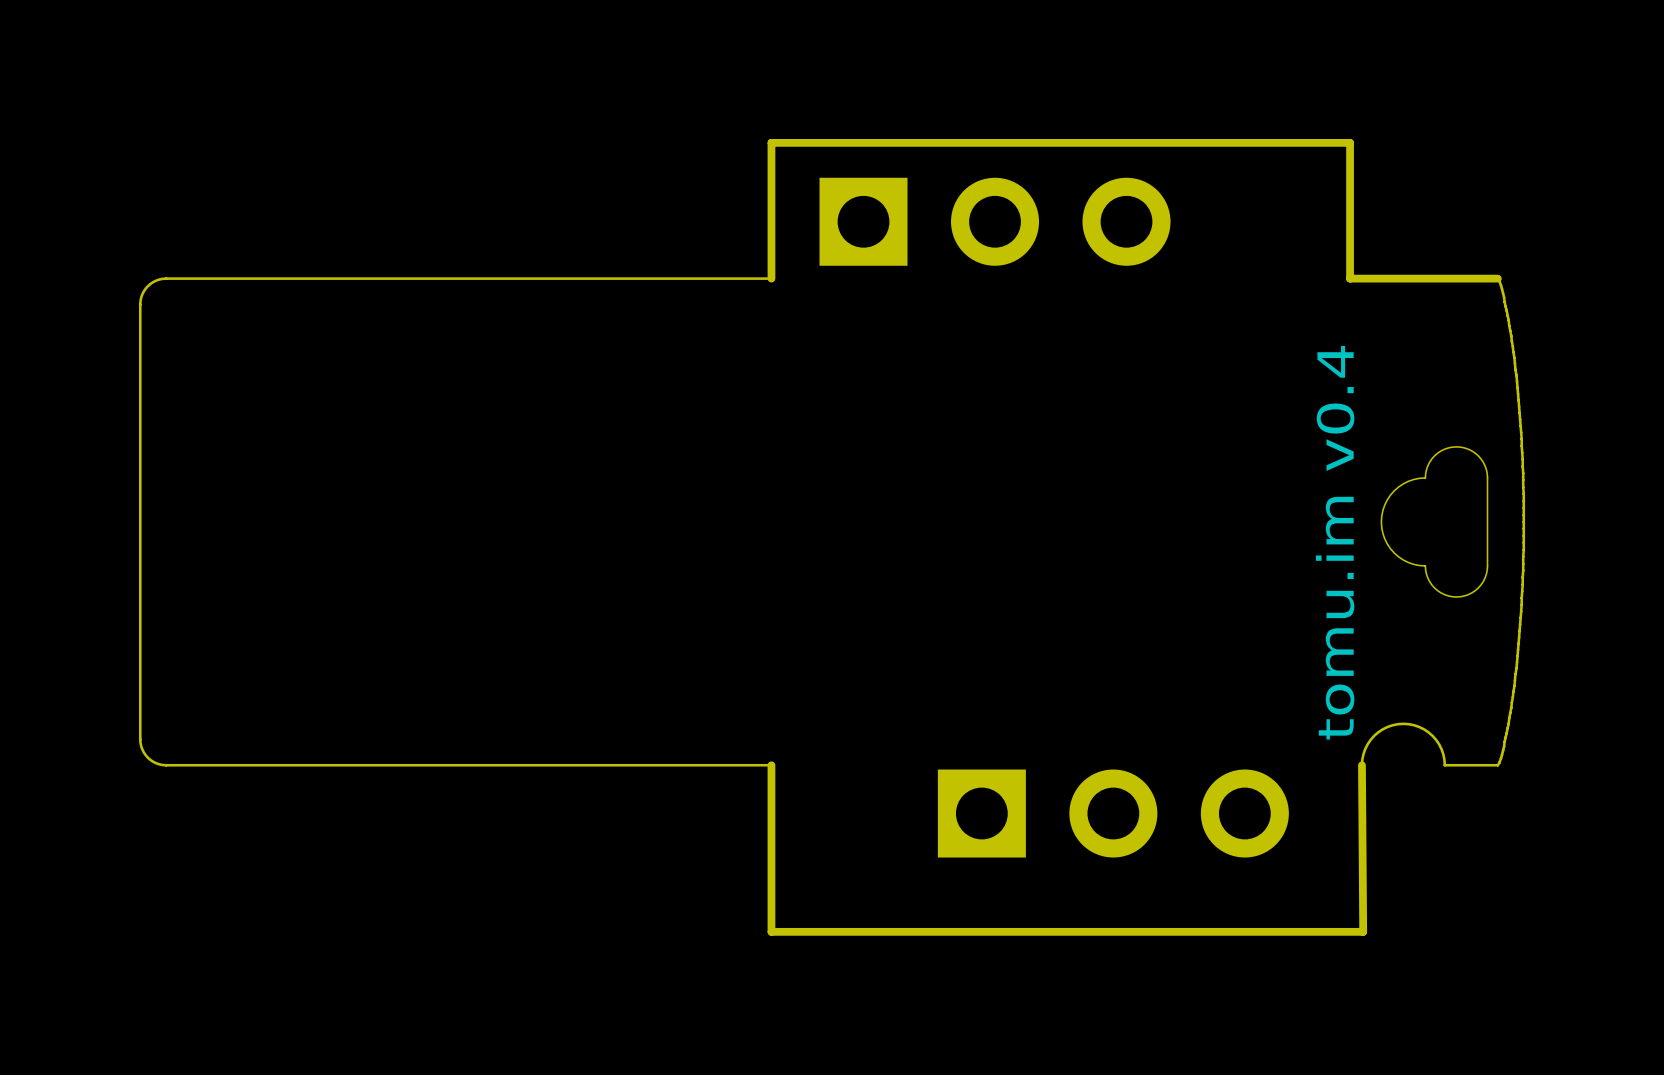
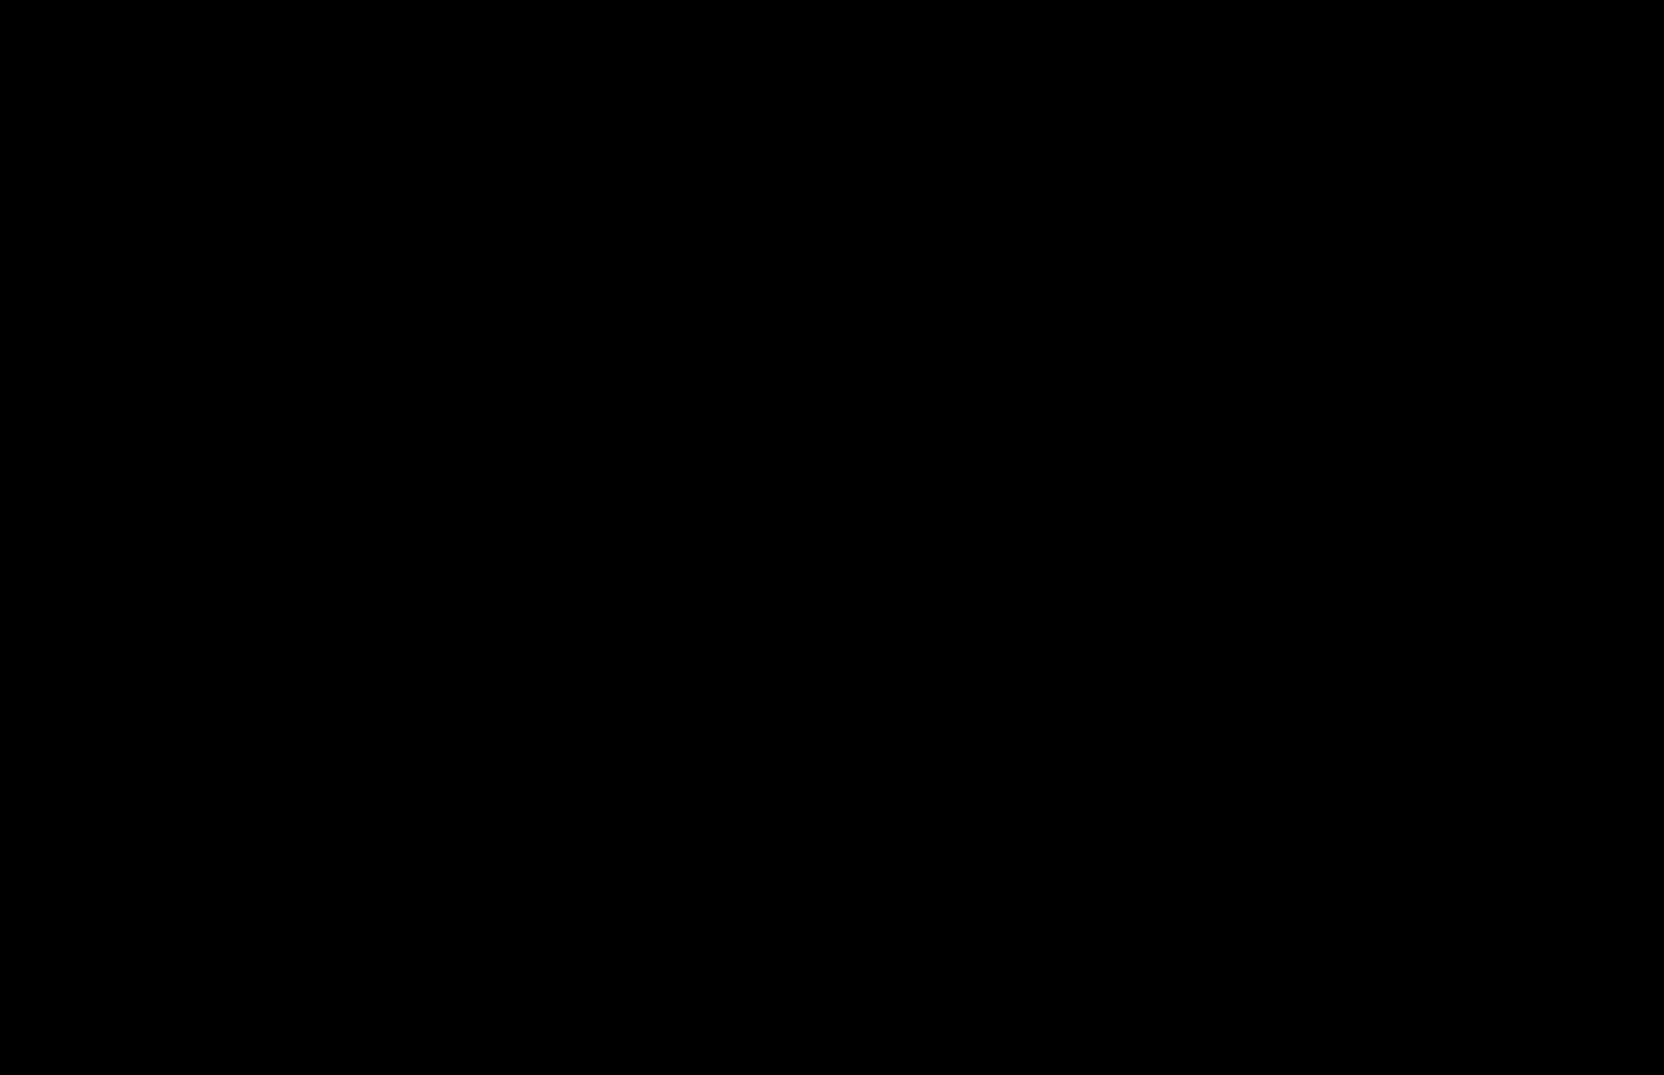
board edge: (771, 142) (1350, 142) (1350, 278) (1497, 278) (1504, 297) (1514, 357) (1521, 439) (1523, 493) (1521, 611) (1514, 686) (1504, 746) (1497, 765) (1444, 765) (1439, 744) (1432, 735) (1419, 726) (1403, 723) (1392, 725) (1382, 729) (1370, 740) (1365, 749) (1361, 765) (1363, 931) (771, 931) (771, 765) (166, 765) (153, 761) (145, 755) (140, 739) (140, 304) (142, 294) (147, 286) (156, 280) (166, 278) (771, 278) (771, 142) -> none
part: (995, 221) -> none
board edge: (1425, 477) (1427, 466) (1434, 455) (1440, 451) (1452, 447) (1460, 447) (1471, 451) (1478, 455) (1485, 466) (1487, 477) (1487, 569) (1481, 584) (1468, 594) (1456, 597) (1440, 592) (1429, 581) (1425, 565) (1408, 562) (1398, 556) (1384, 538) (1381, 516) (1390, 495) (1408, 481) (1425, 477) -> none
text: tomu.im v0.4 (1335, 542) -> none
part: (1113, 813) -> none

